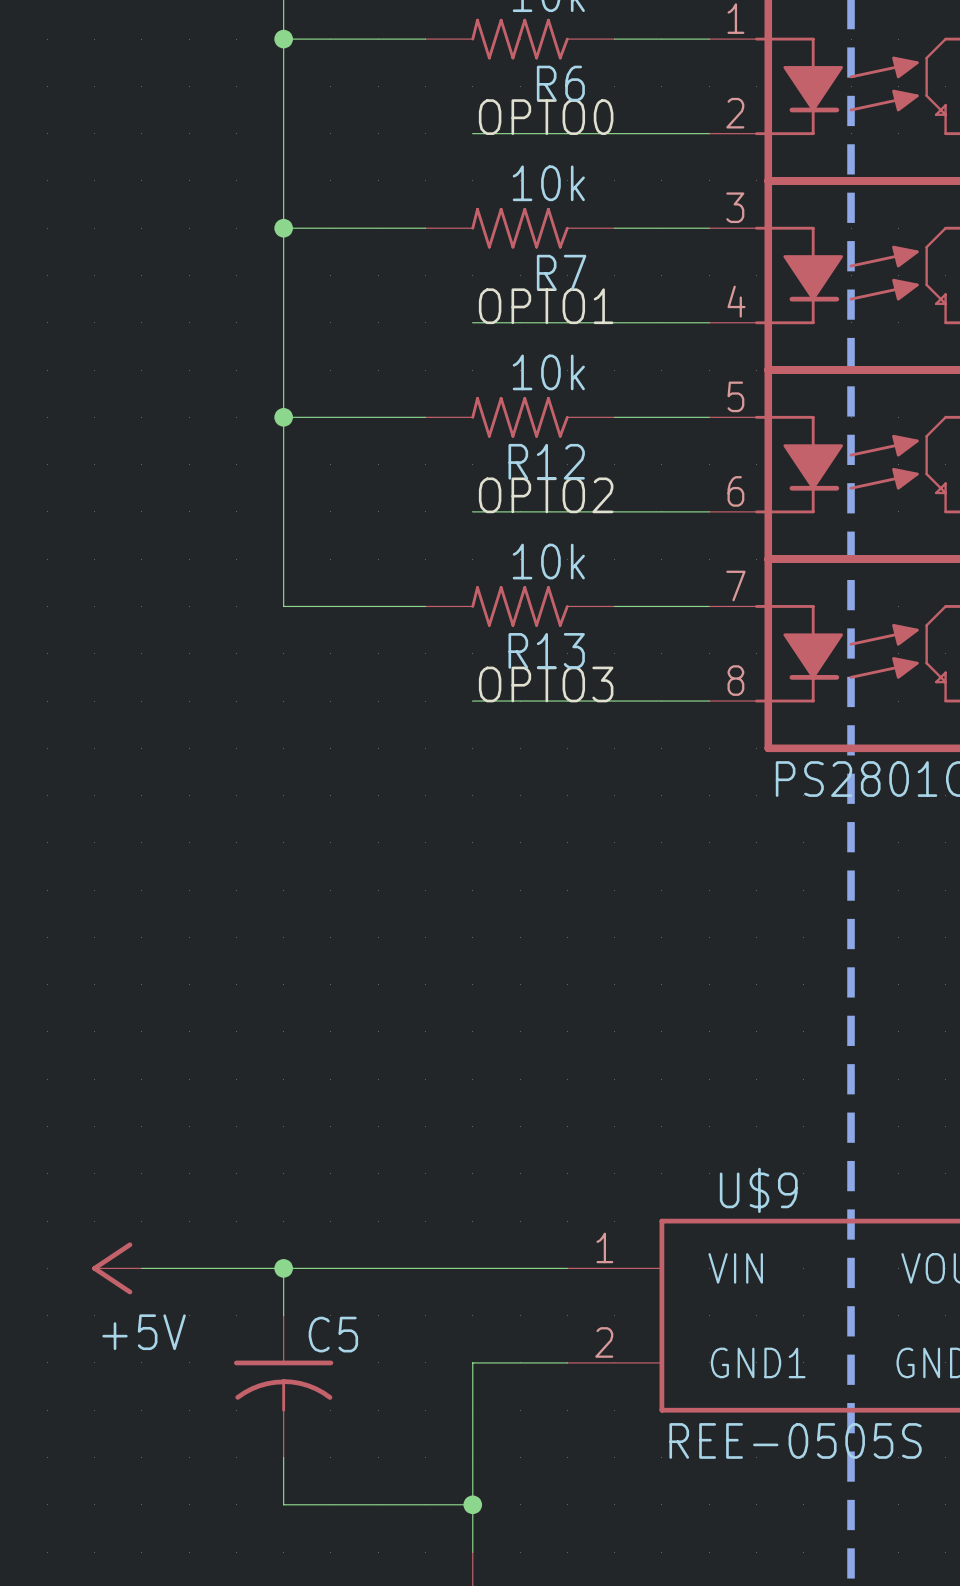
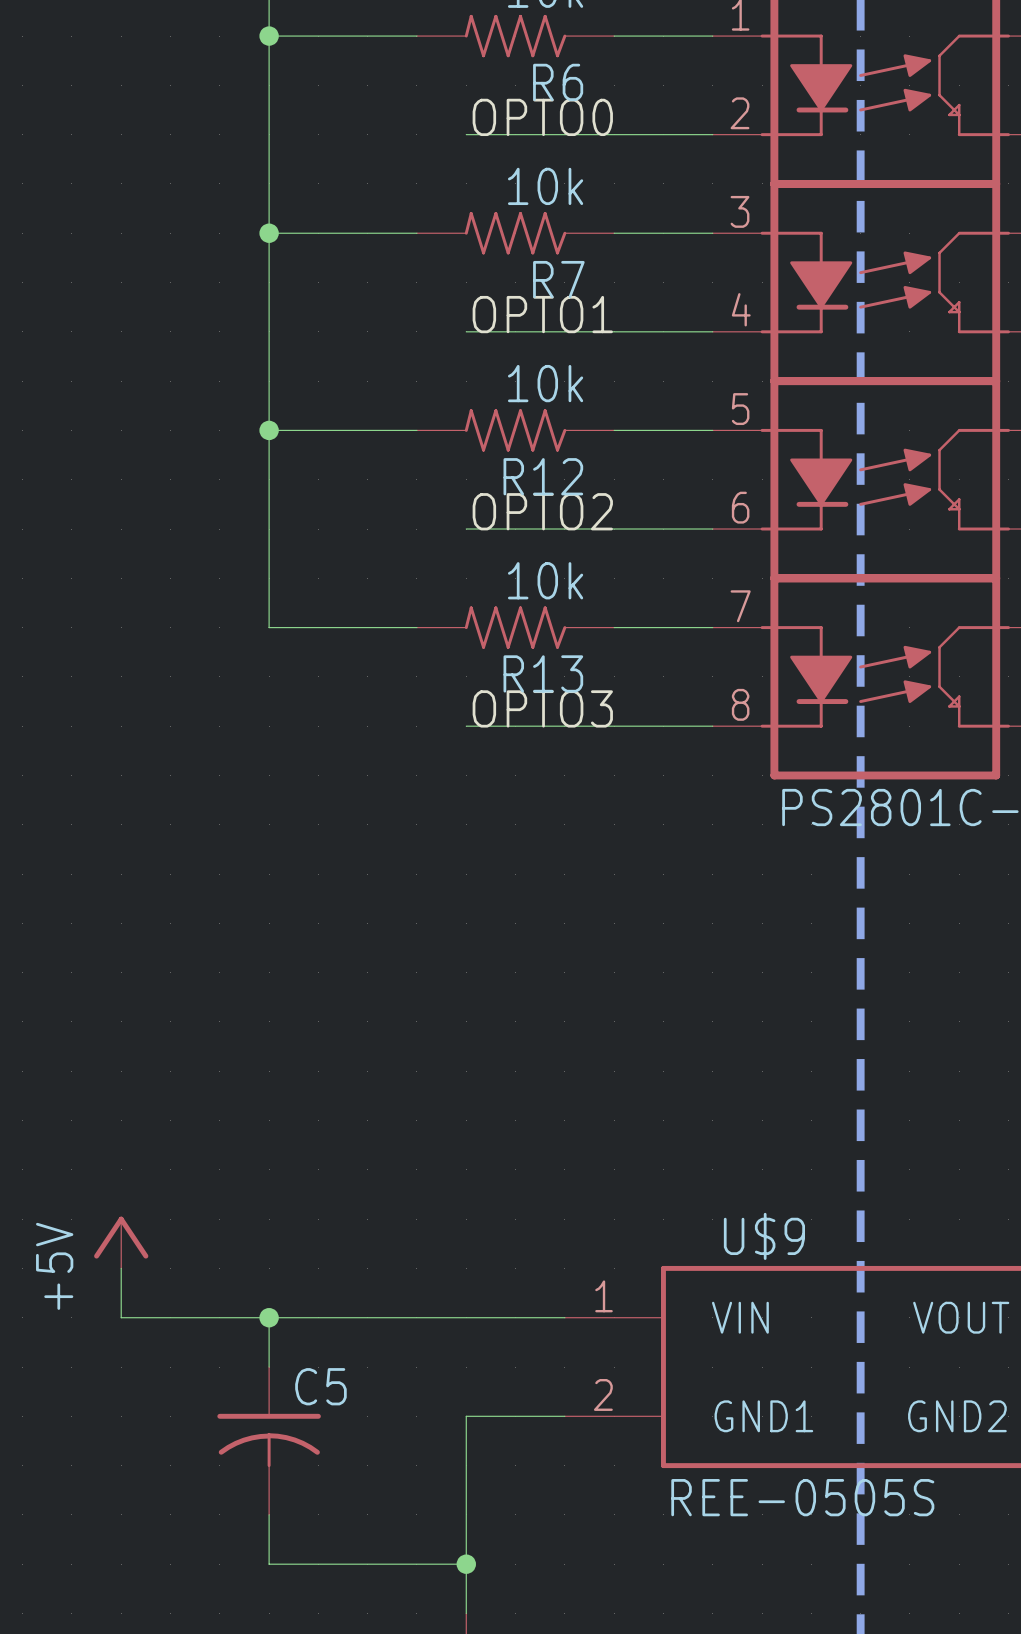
wire: none -> (121, 1268) (121, 1317)
power symbol rotation: 0° (112, 1268) -> 90° clockwise (121, 1237)
power symbol position: +5V (116, 1268) -> +5V (121, 1242)

